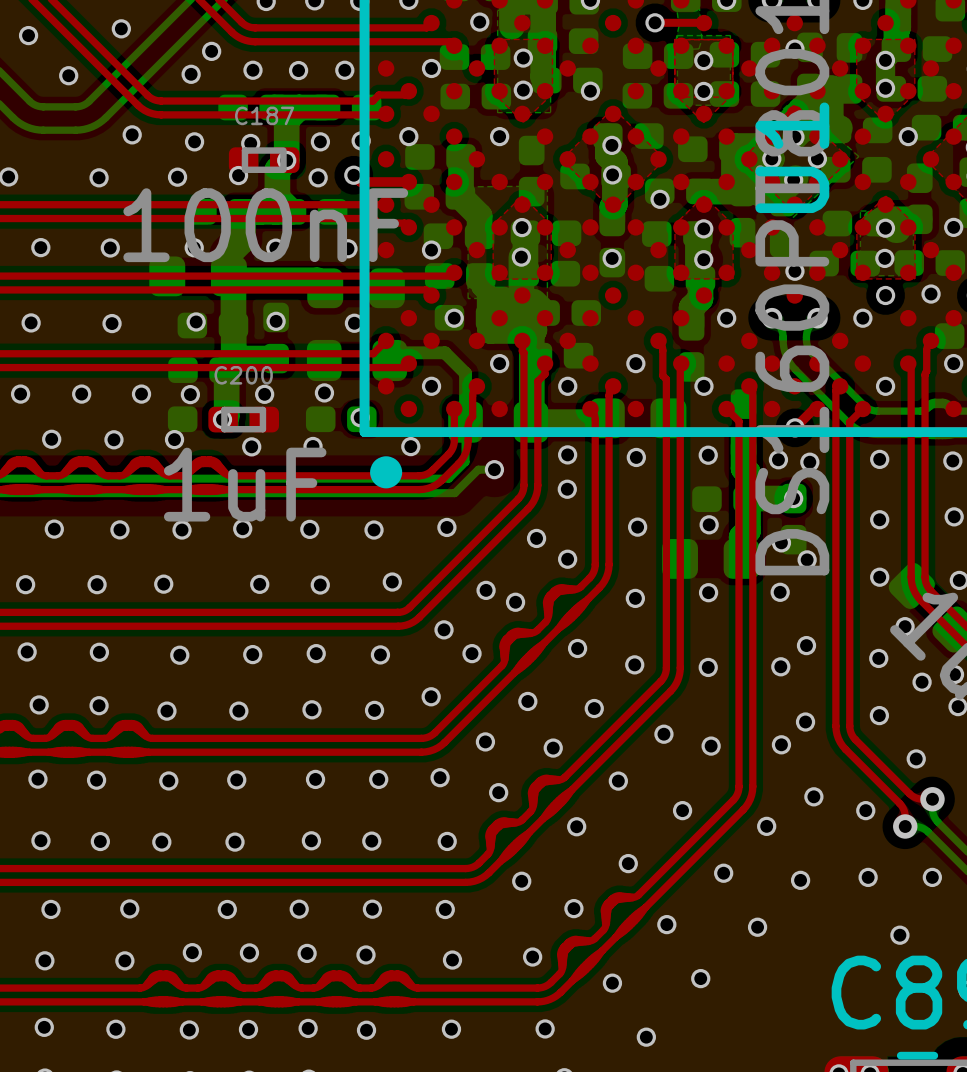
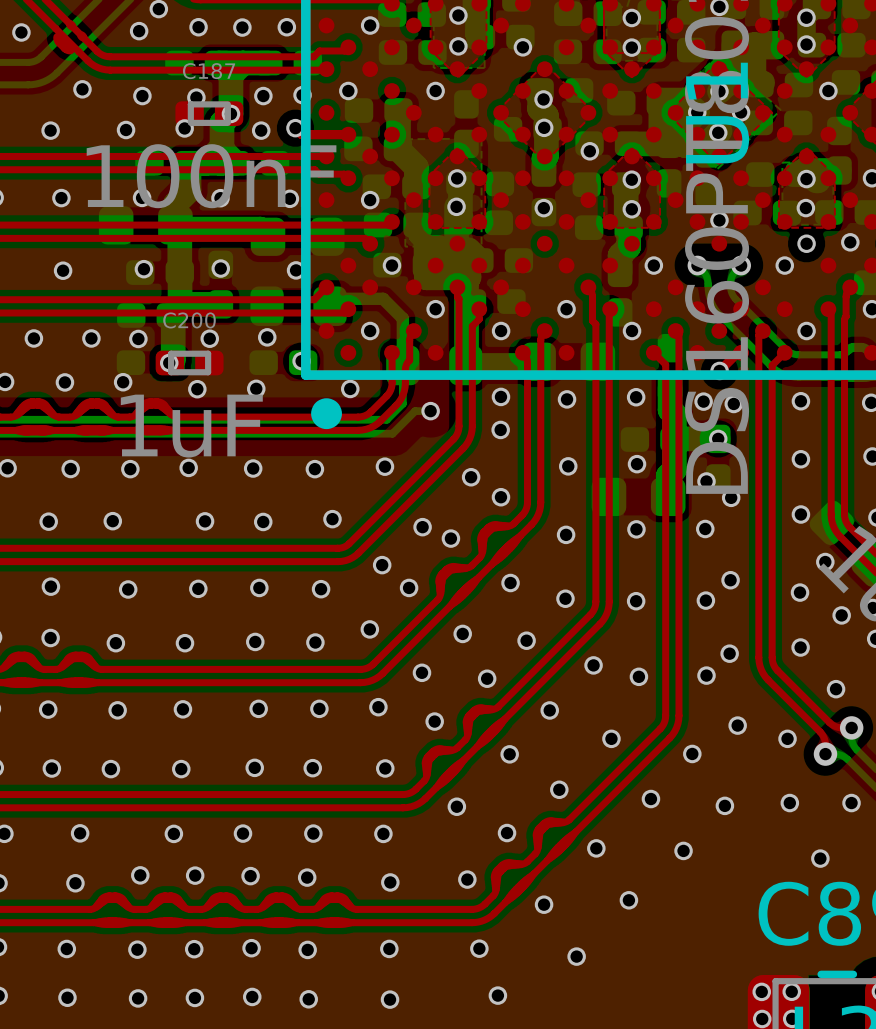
top track: none -> (57, 37) (65, 47) (70, 49)

